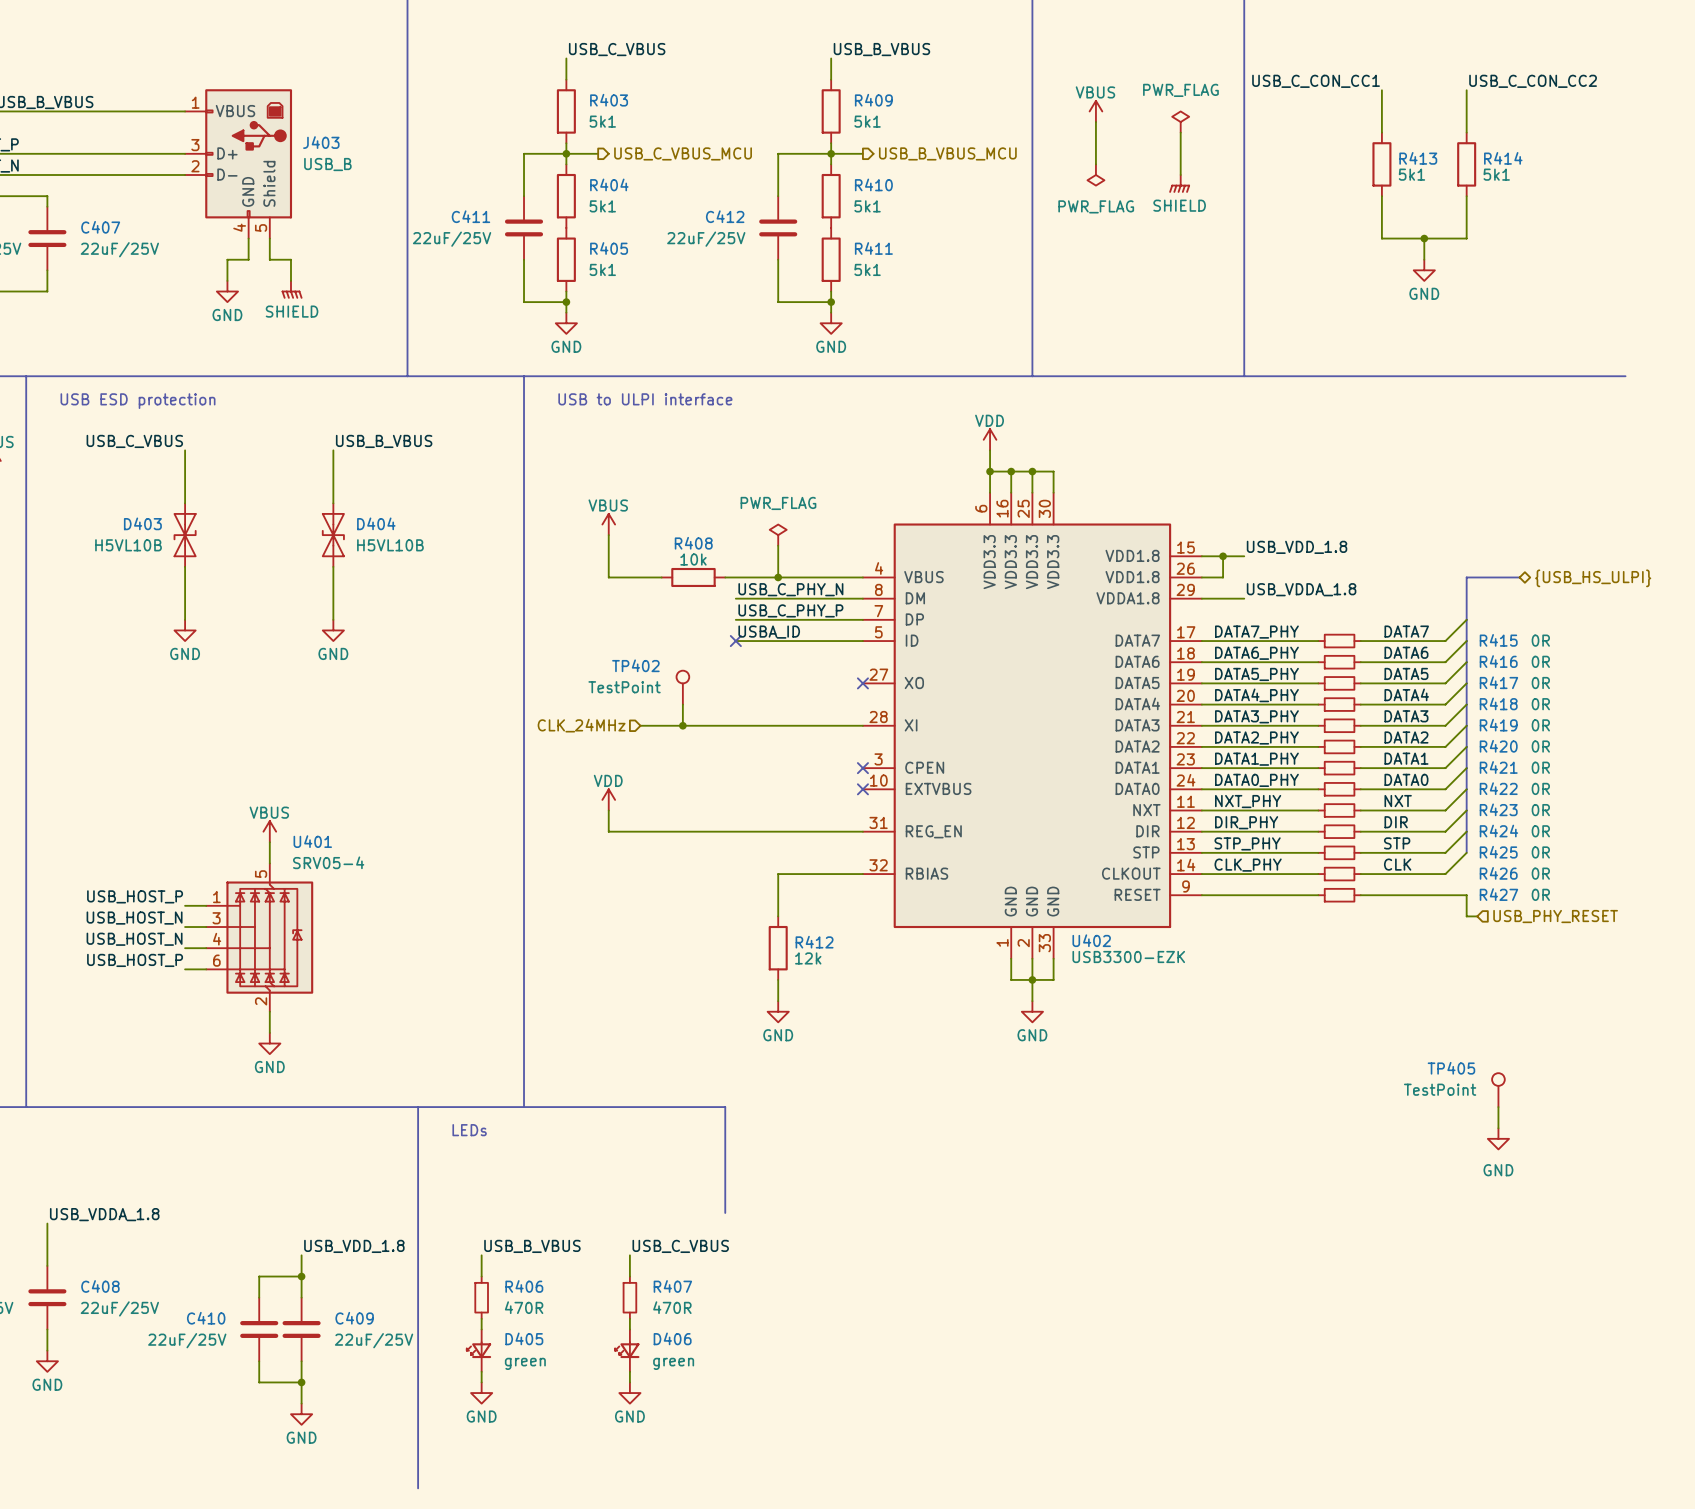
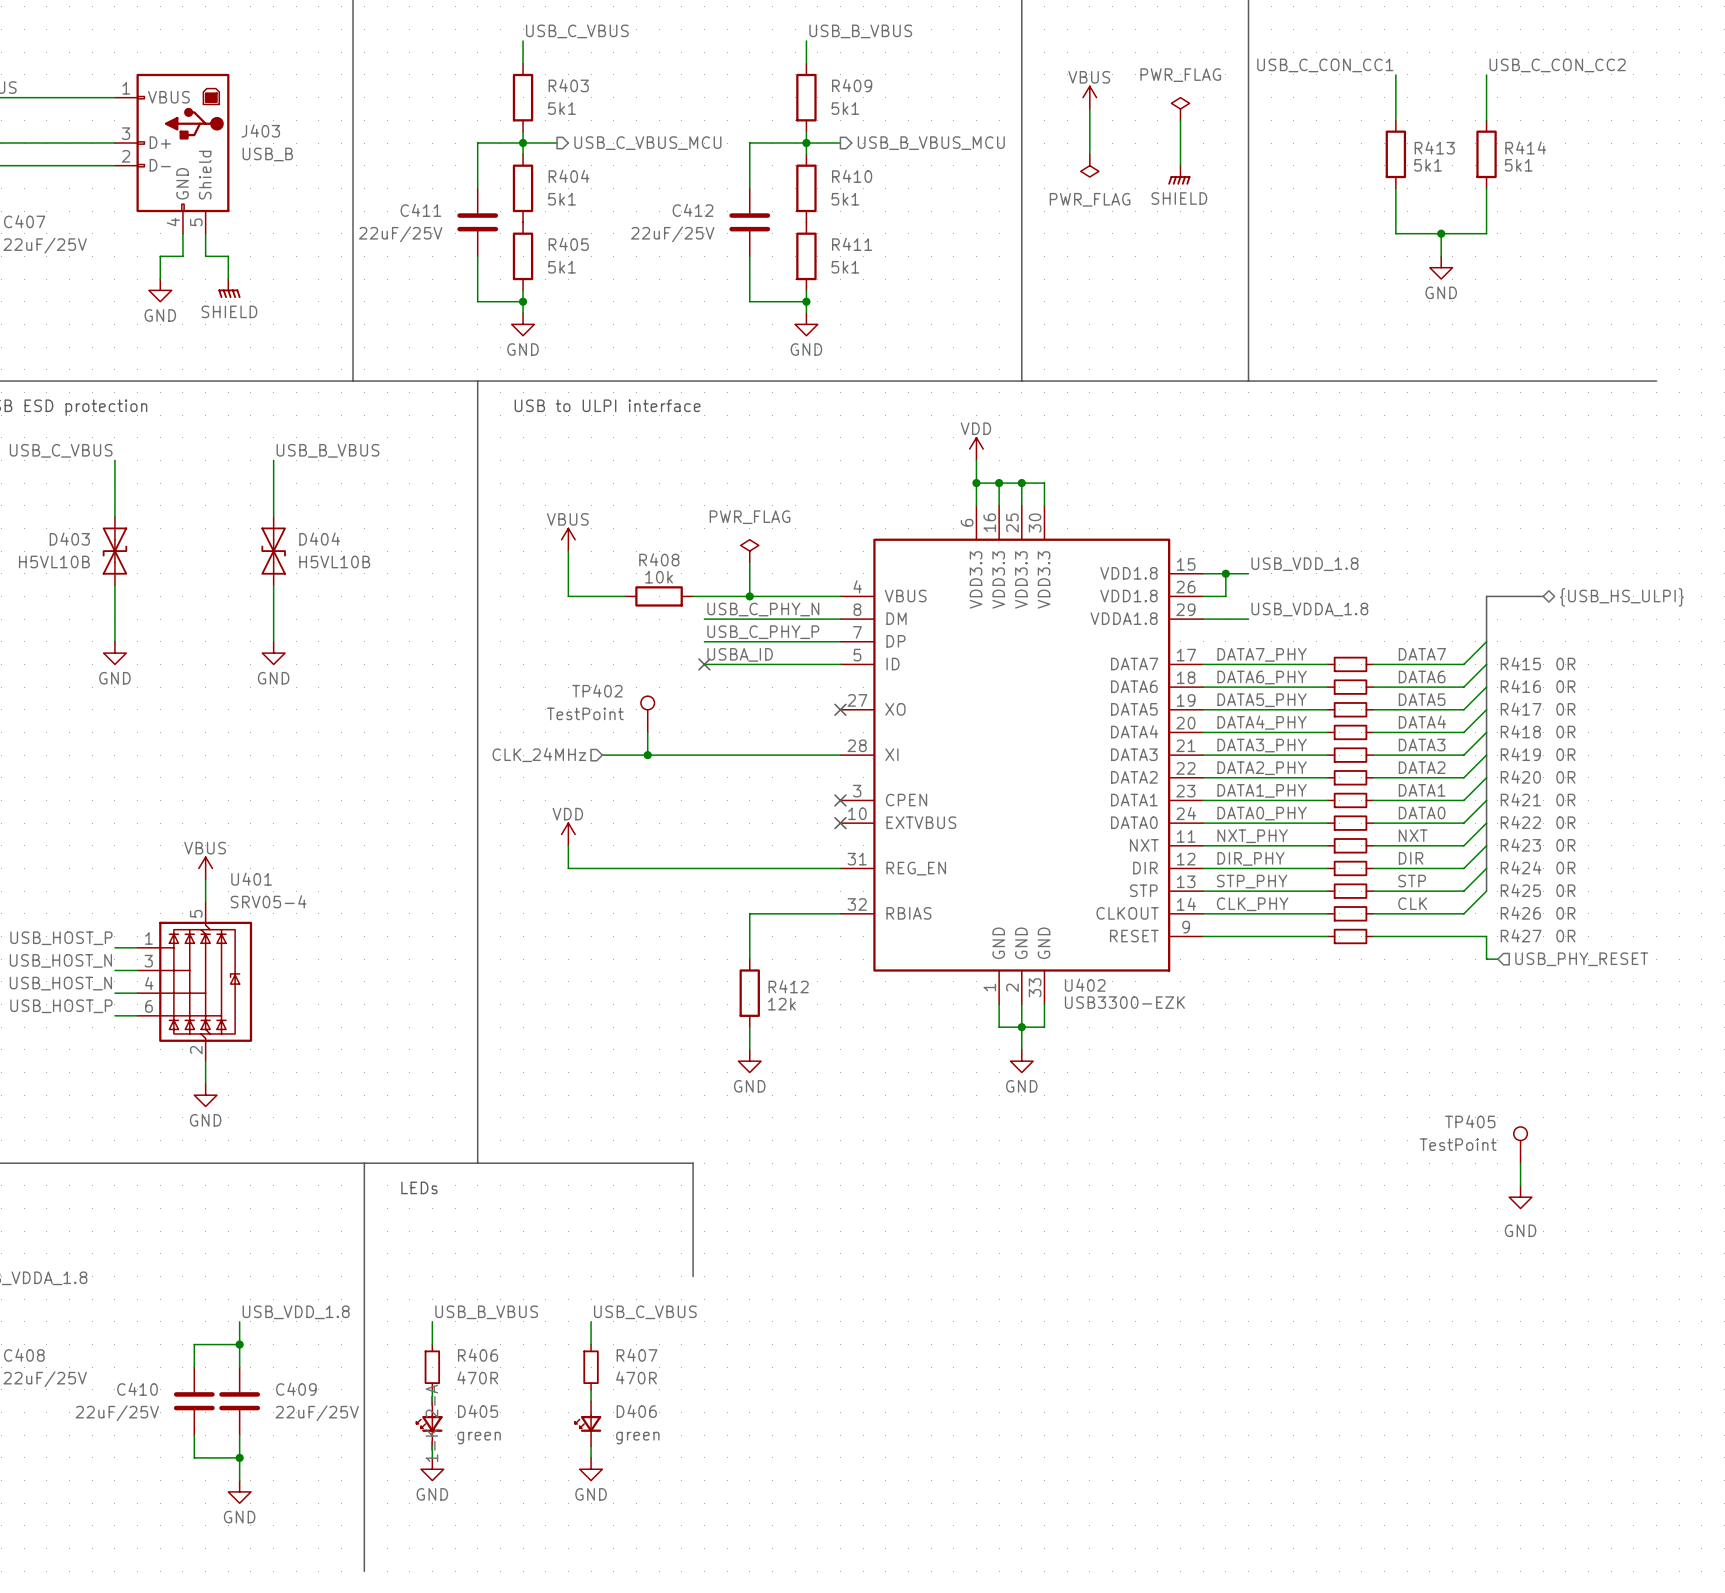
D405 text: none -> 1=K 2=A (431, 1423)

